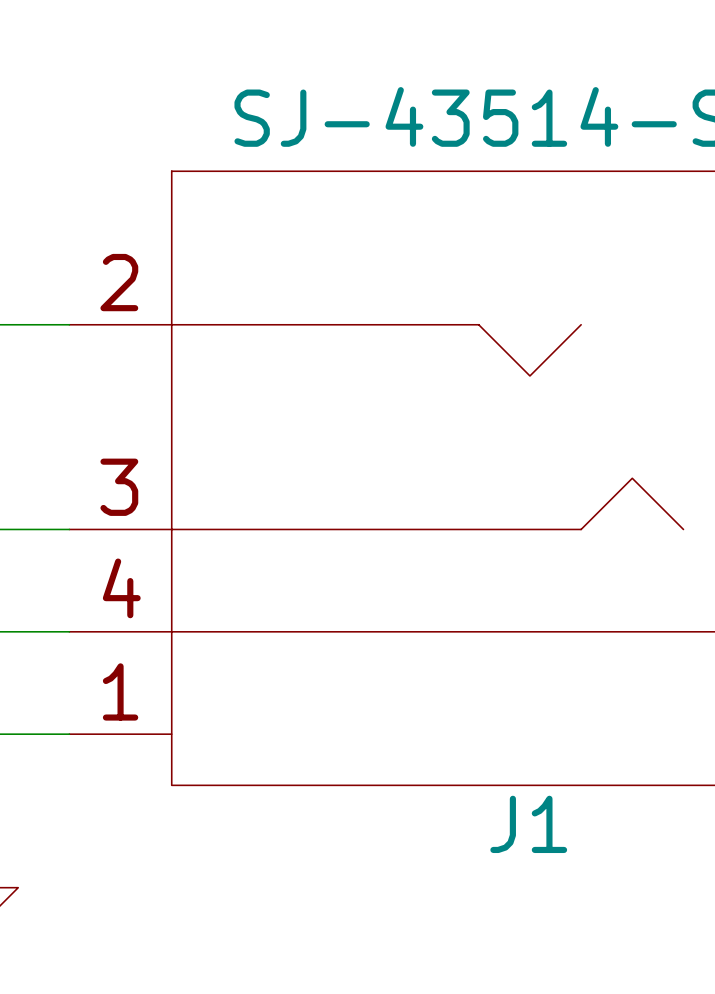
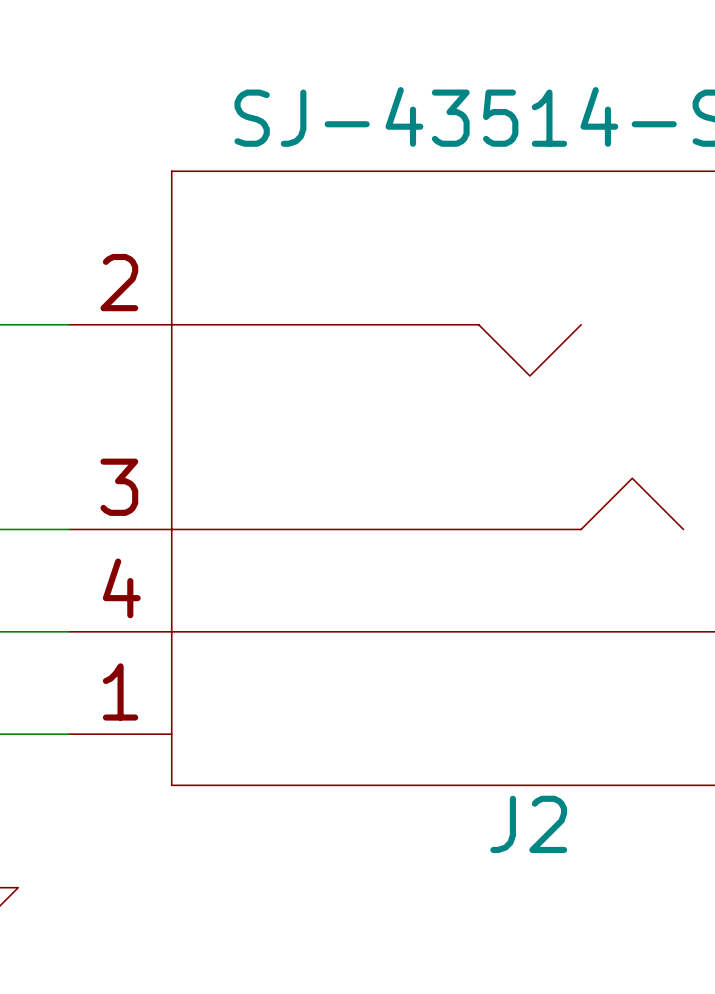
J1 name: J1 (528, 824) -> J2 (528, 824)

